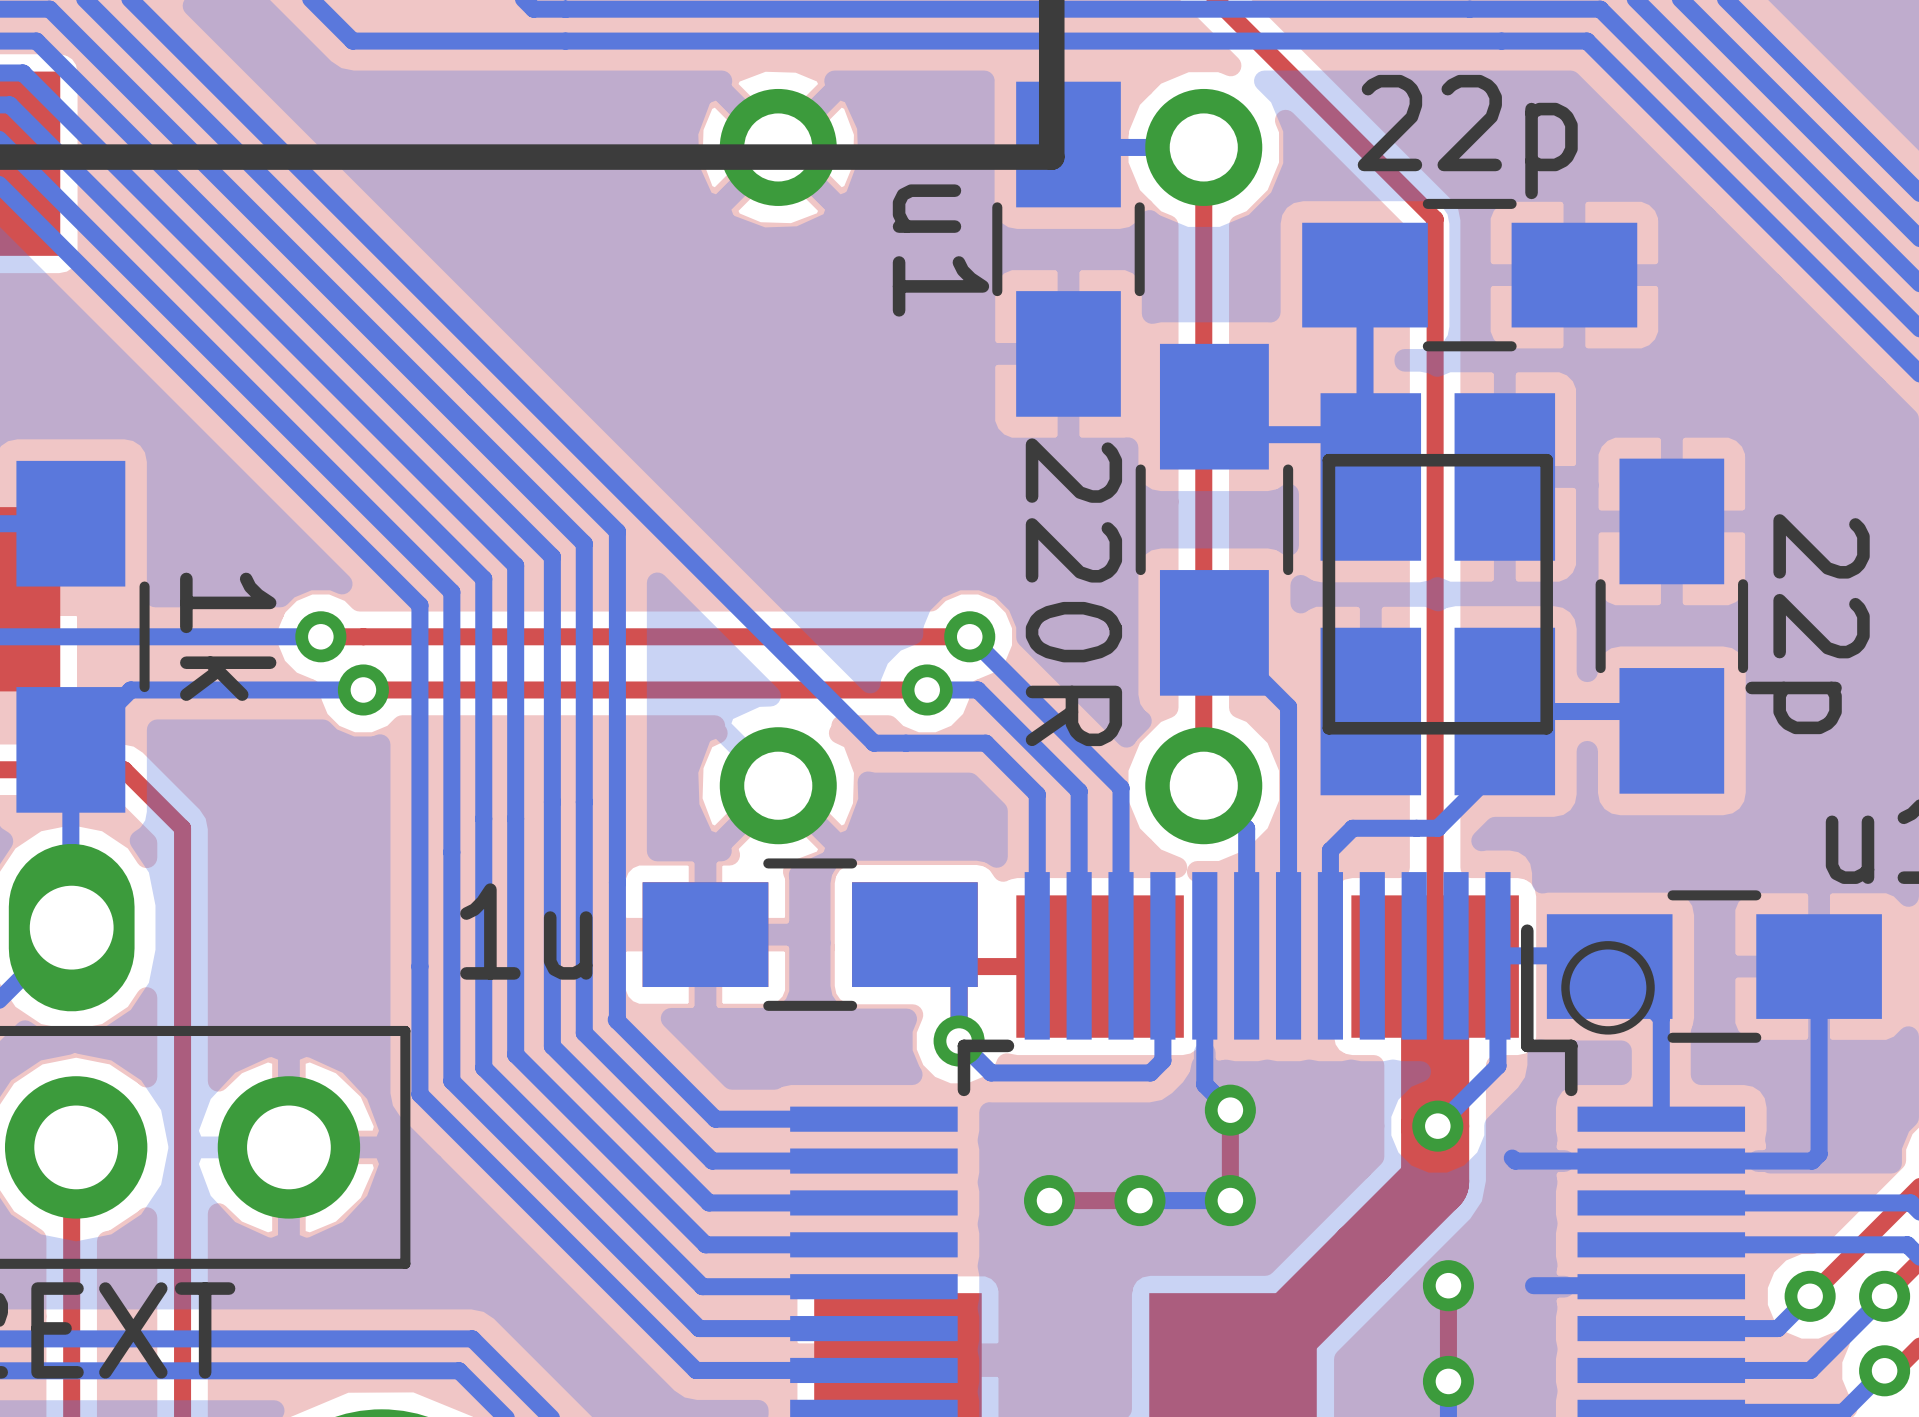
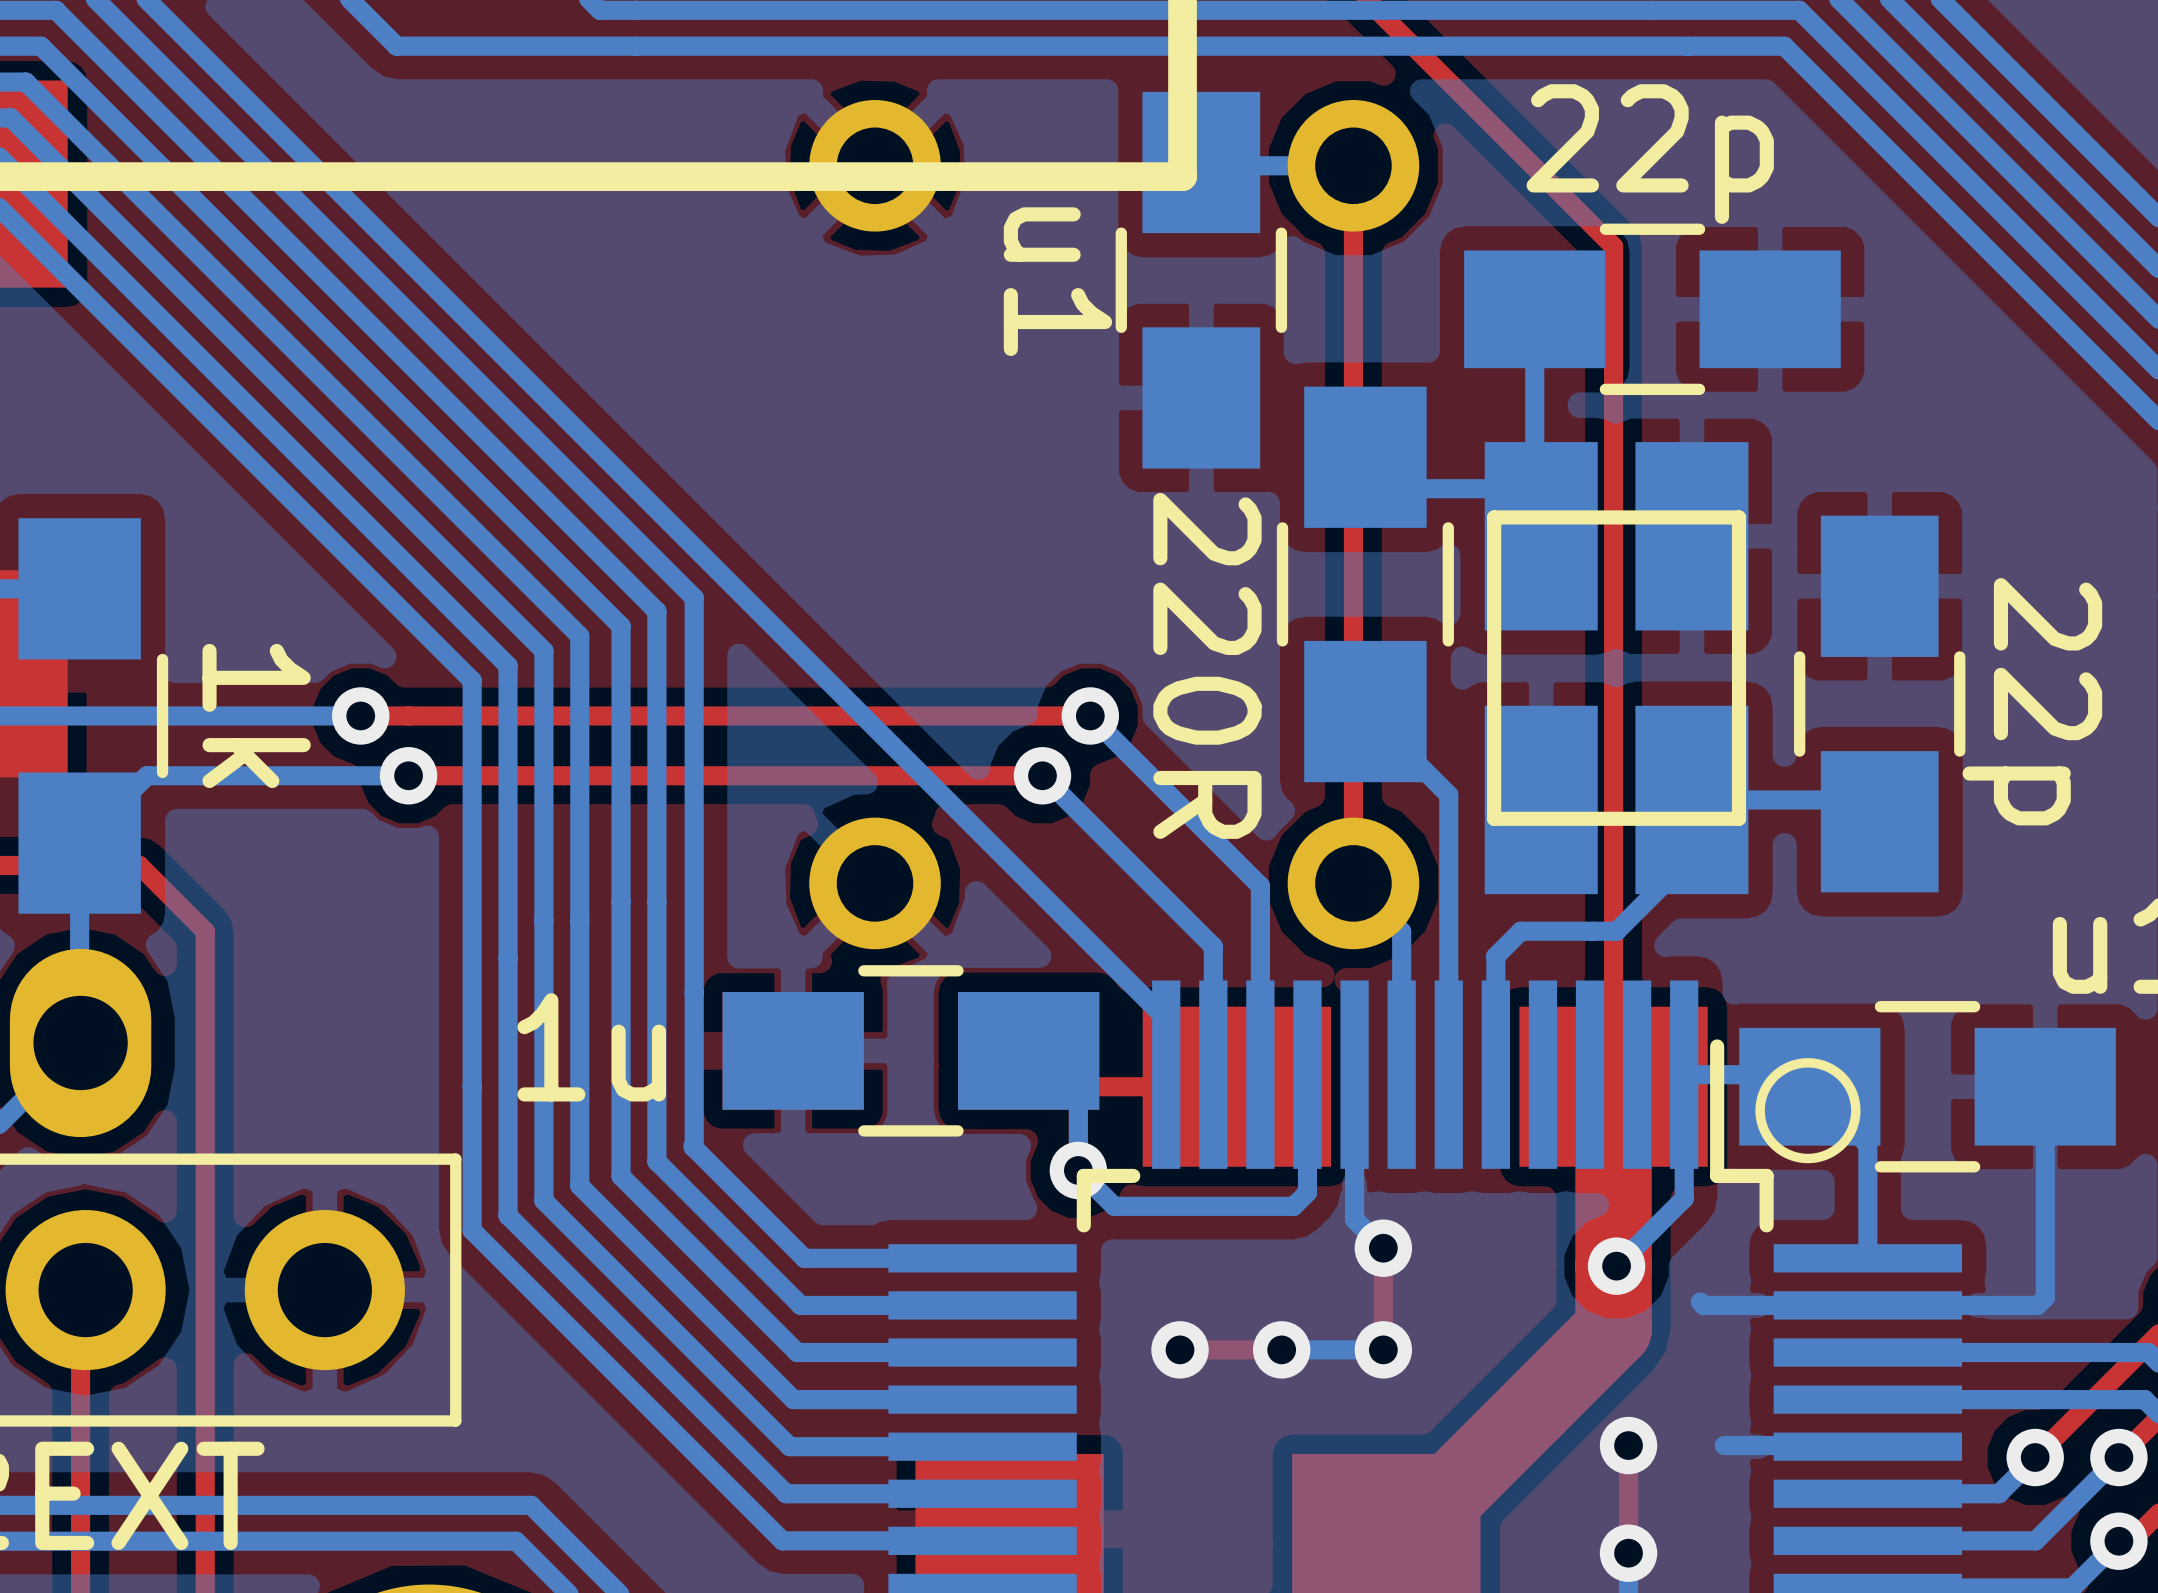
bottom track: (927, 689) (977, 689) (1079, 791) (1079, 841) -> (1042, 775) (1213, 946)
bottom track: (874, 743) (985, 743) (1037, 794) (1037, 906) -> (982, 835) (1166, 1019)

